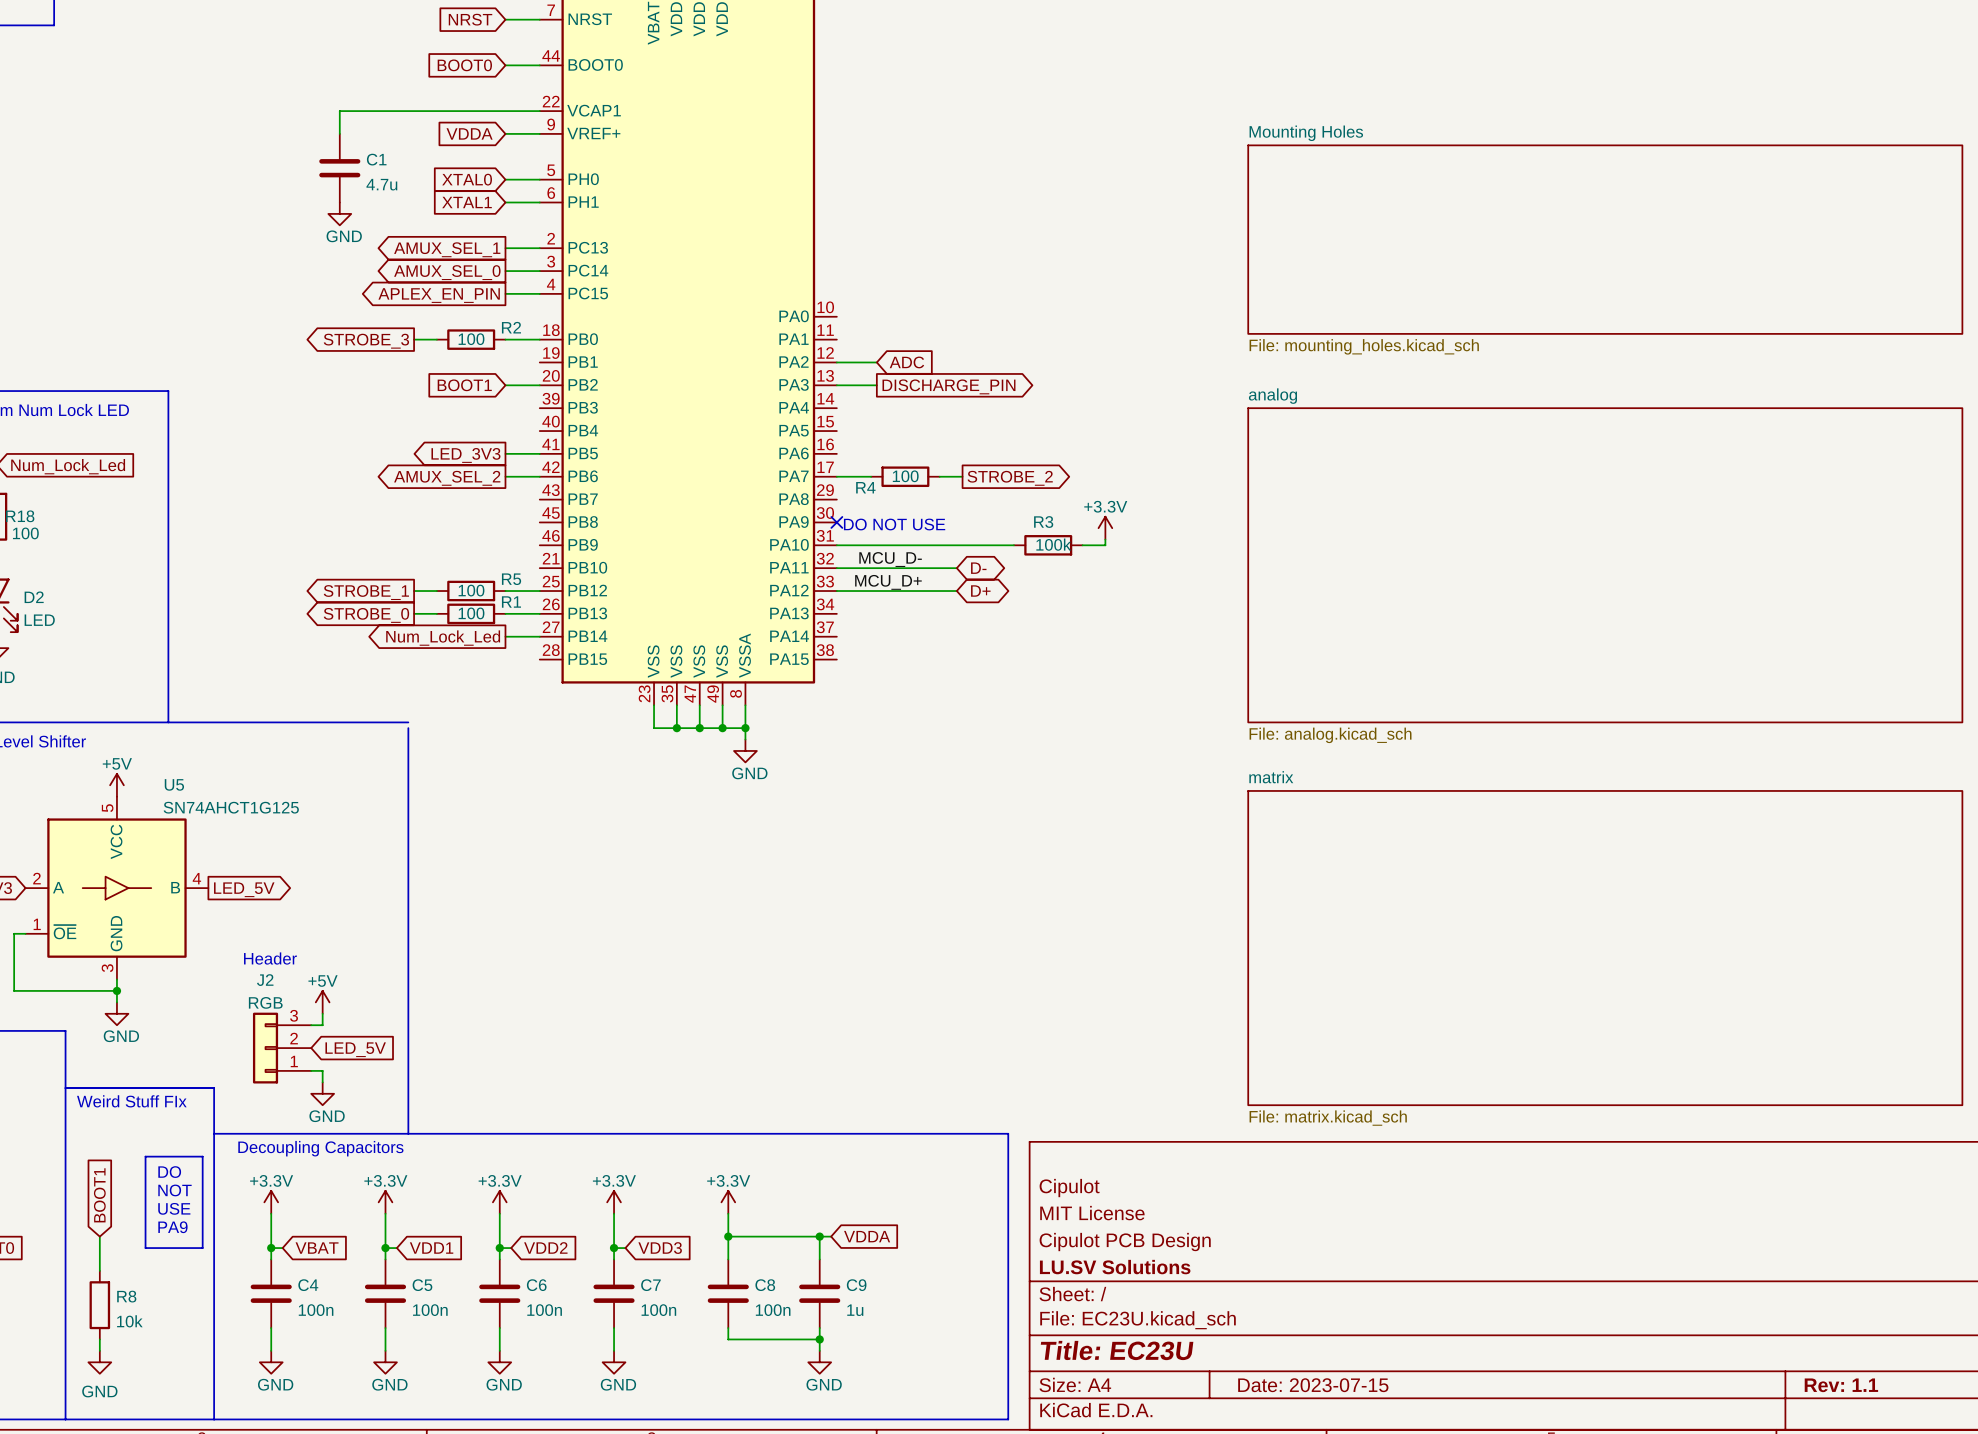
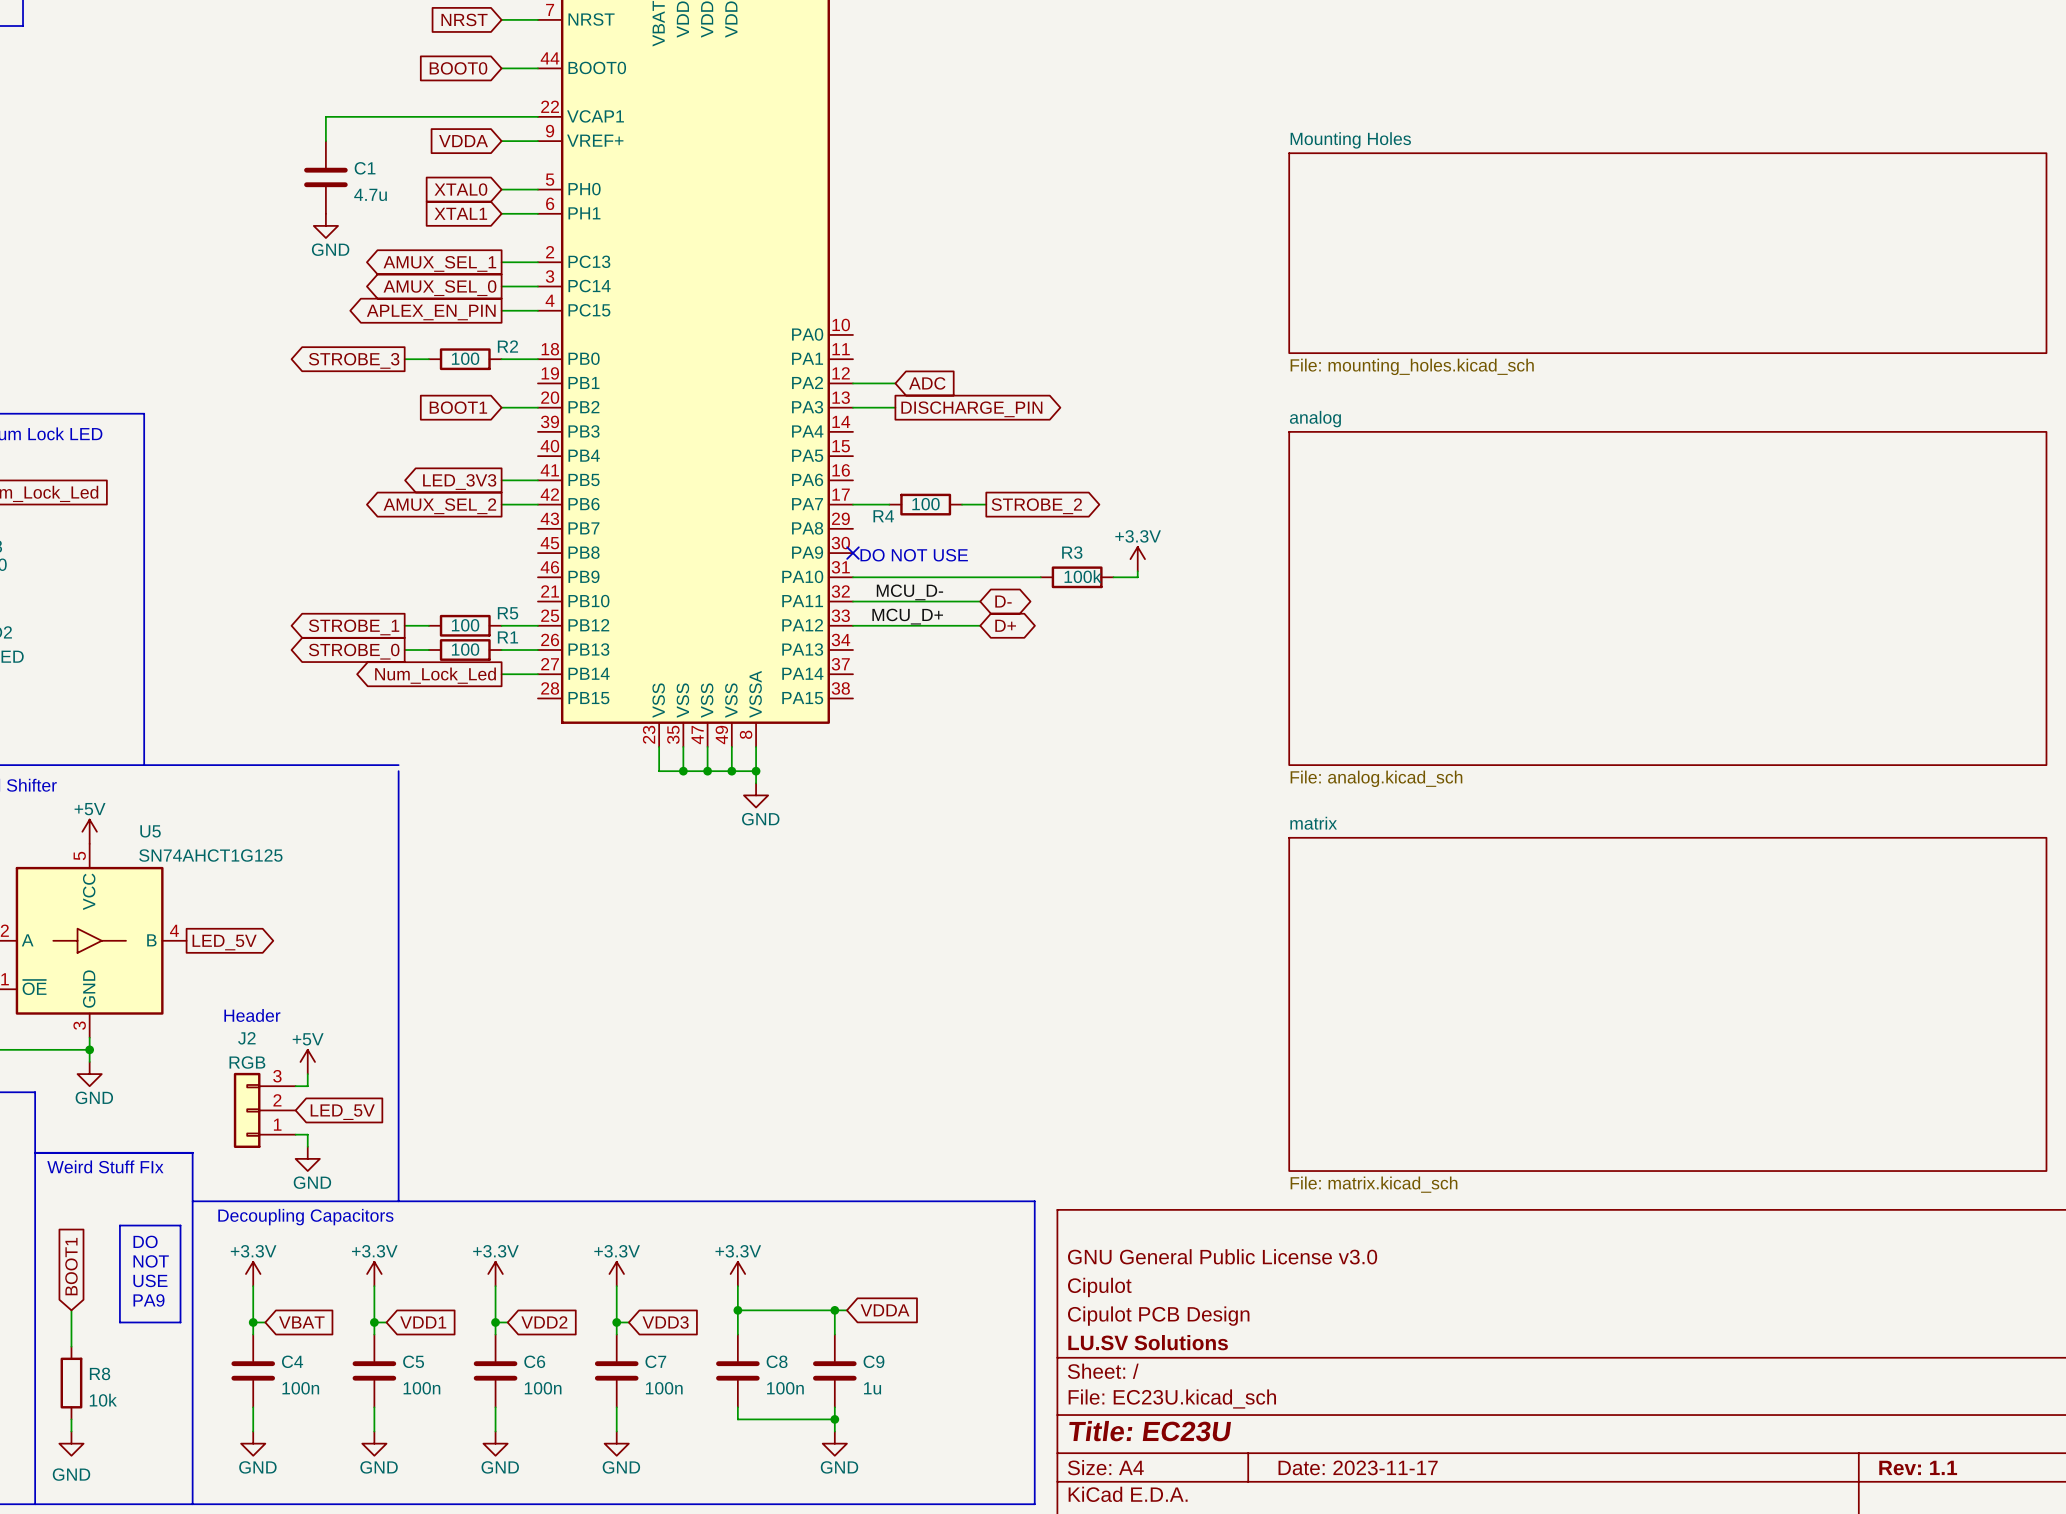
title block: Cipulot (1069, 1188) -> GNU General Public License v3.0 (1222, 1256)
title block: MIT License (1092, 1213) -> Cipulot (1099, 1287)
title block: Date: 2023-07-15 (1313, 1385) -> Date: 2023-11-17 (1358, 1467)

